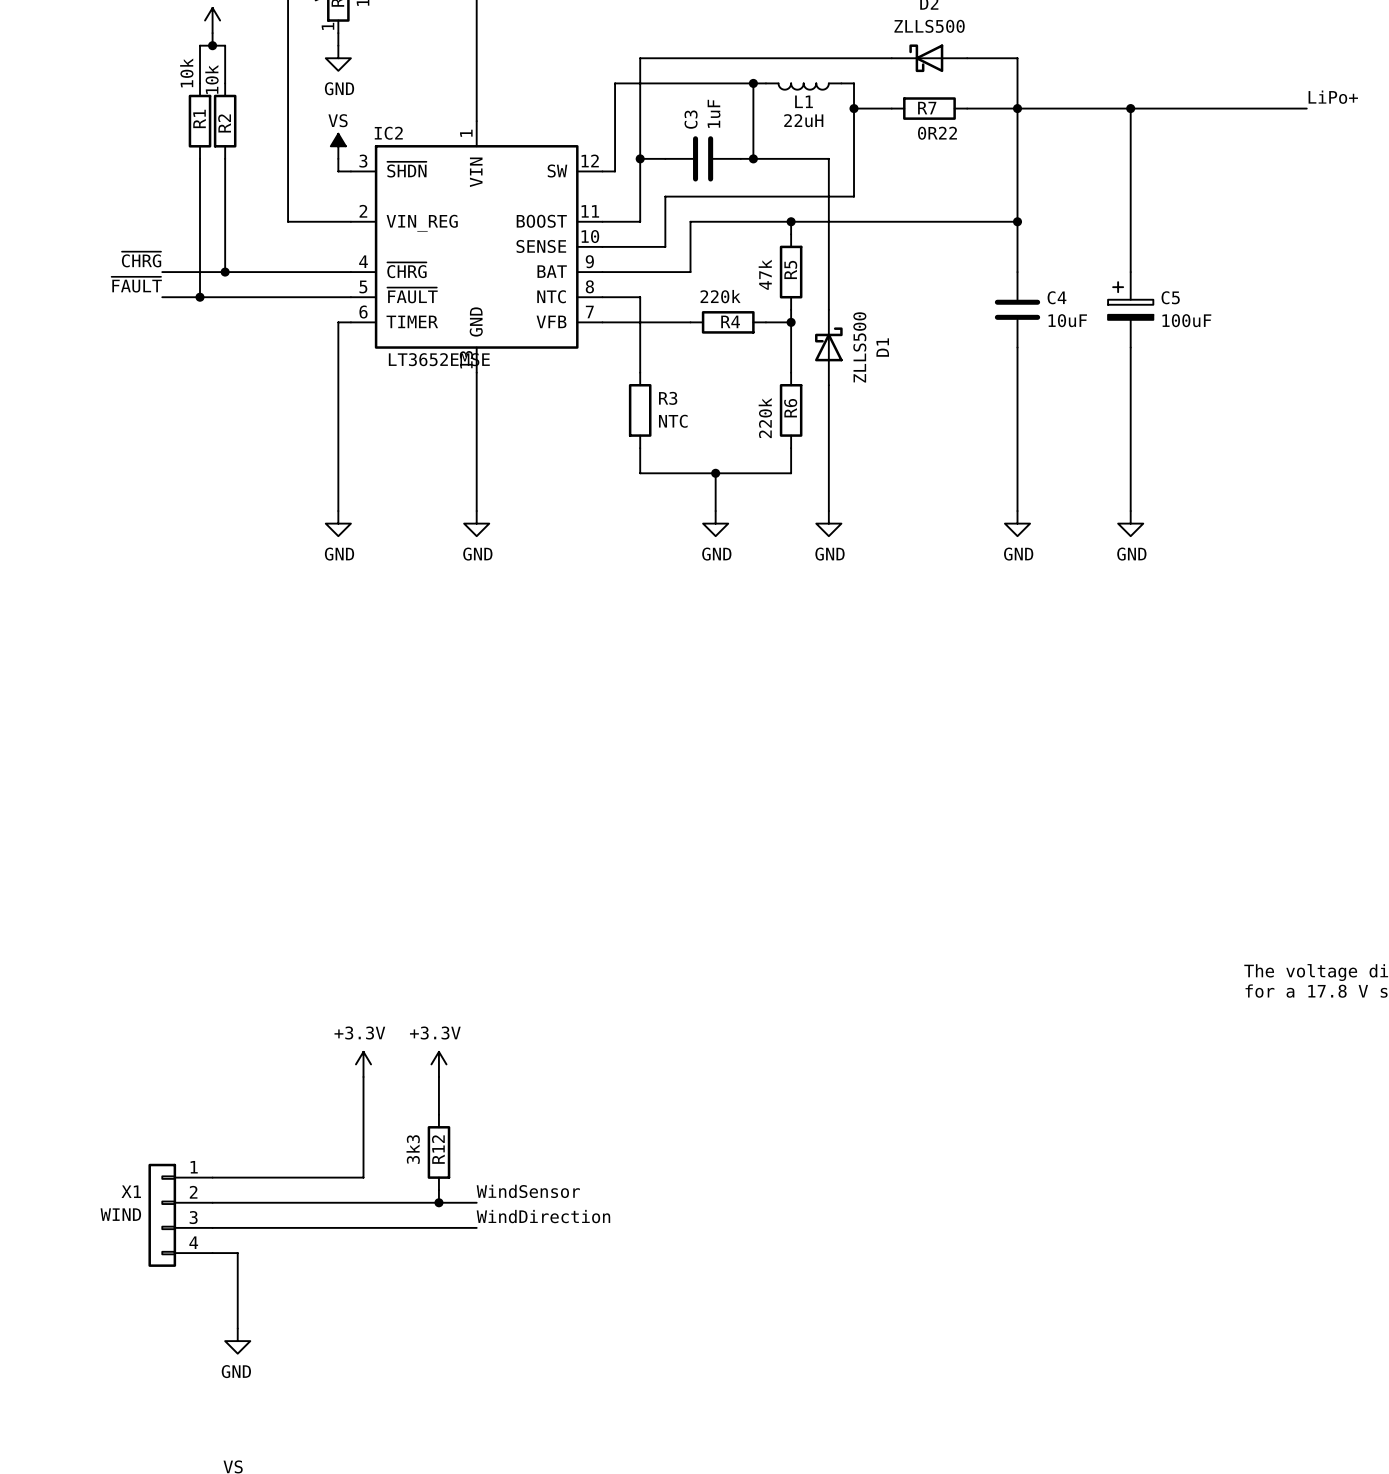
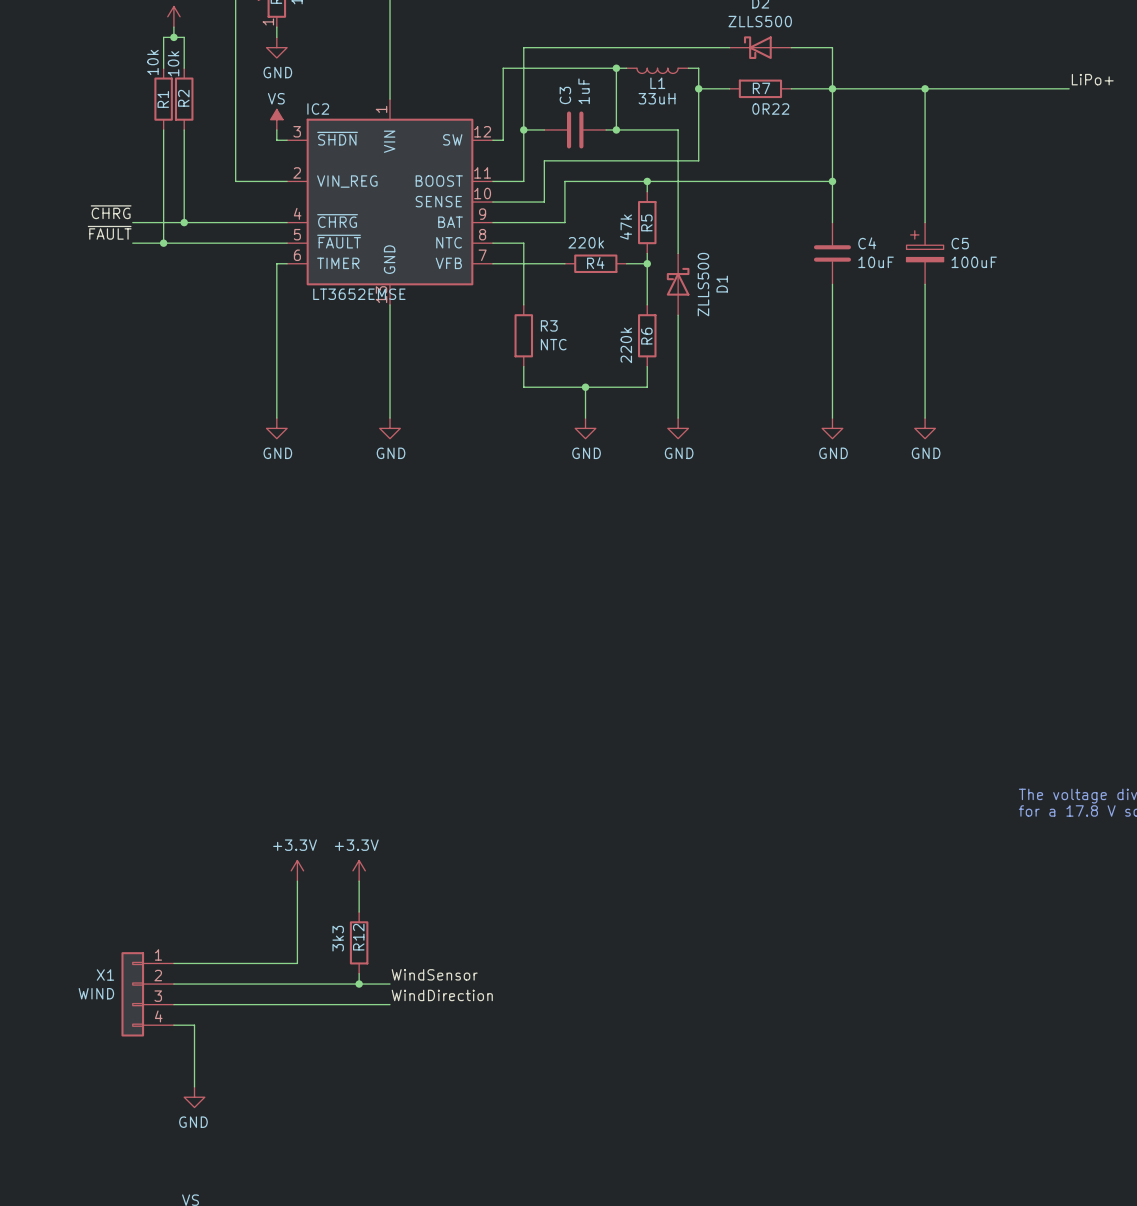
L1 value: 22uH (803, 120) -> 33uH (657, 98)

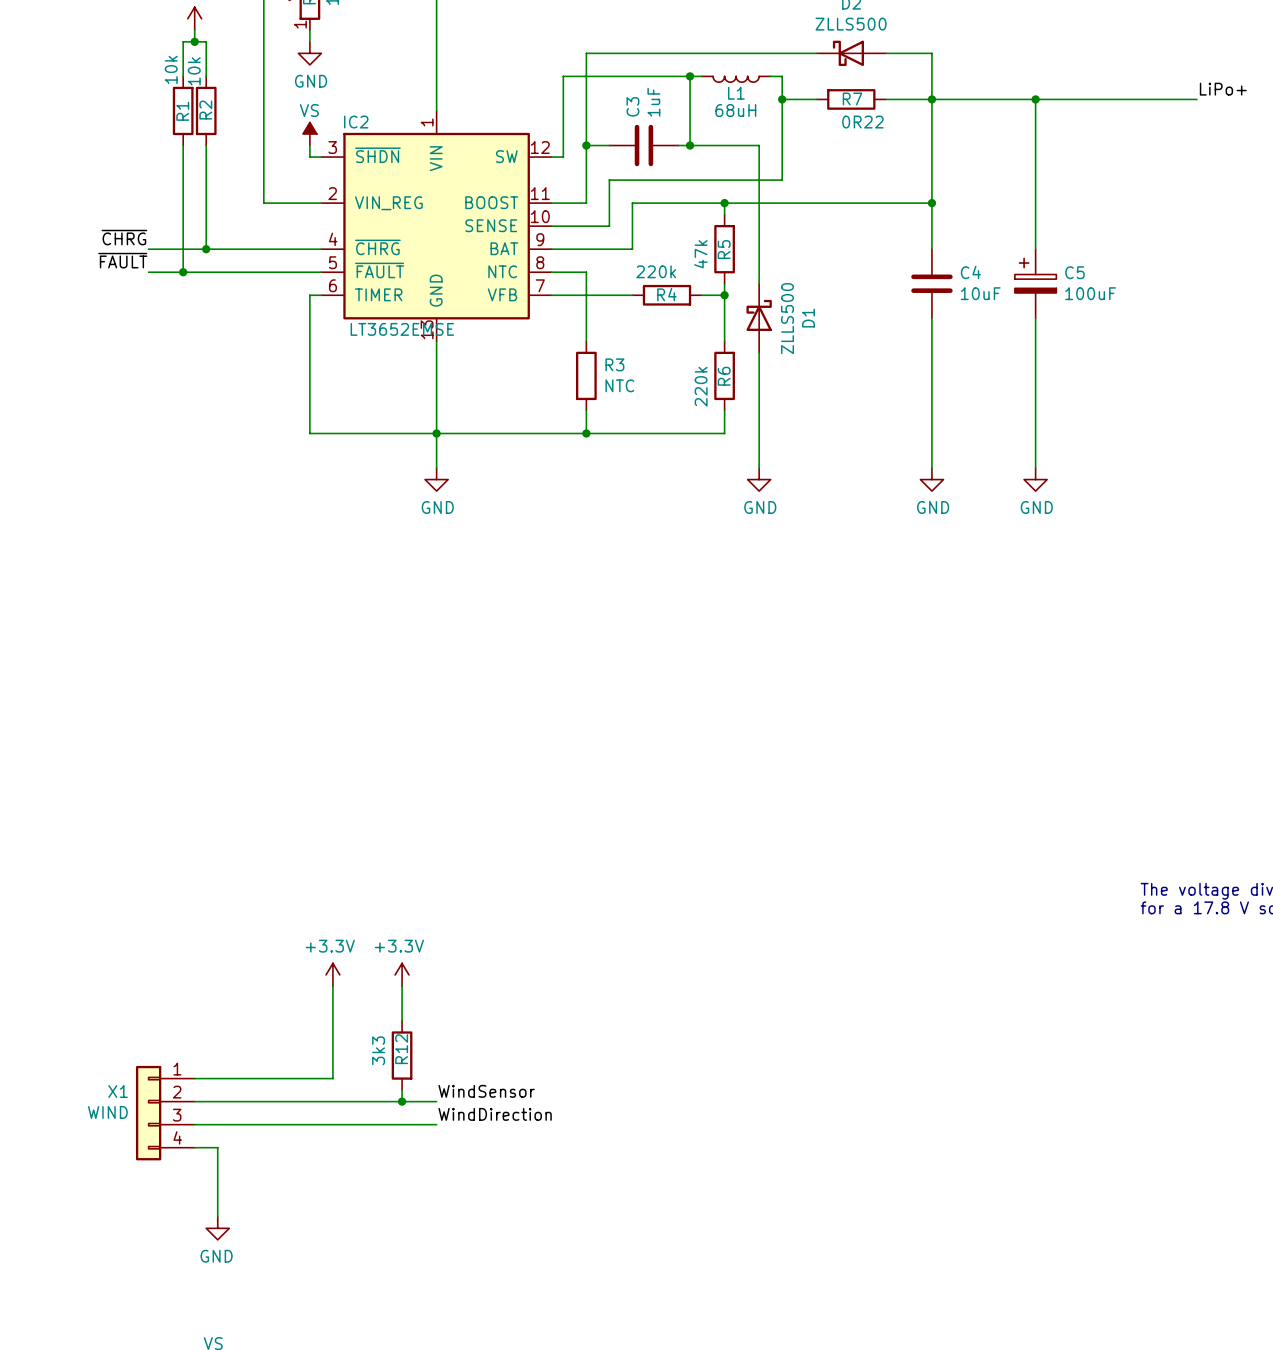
L1 value: 33uH (657, 98) -> 68uH (735, 110)
wire: (276, 387) (276, 418) -> (309, 433) (586, 433)
junction: none -> (436, 433)
junction: none -> (586, 433)
wire: (585, 387) (585, 418) -> none
junction: (585, 387) -> none
power symbol: GND (276, 428) -> none
power symbol: GND (585, 428) -> none

